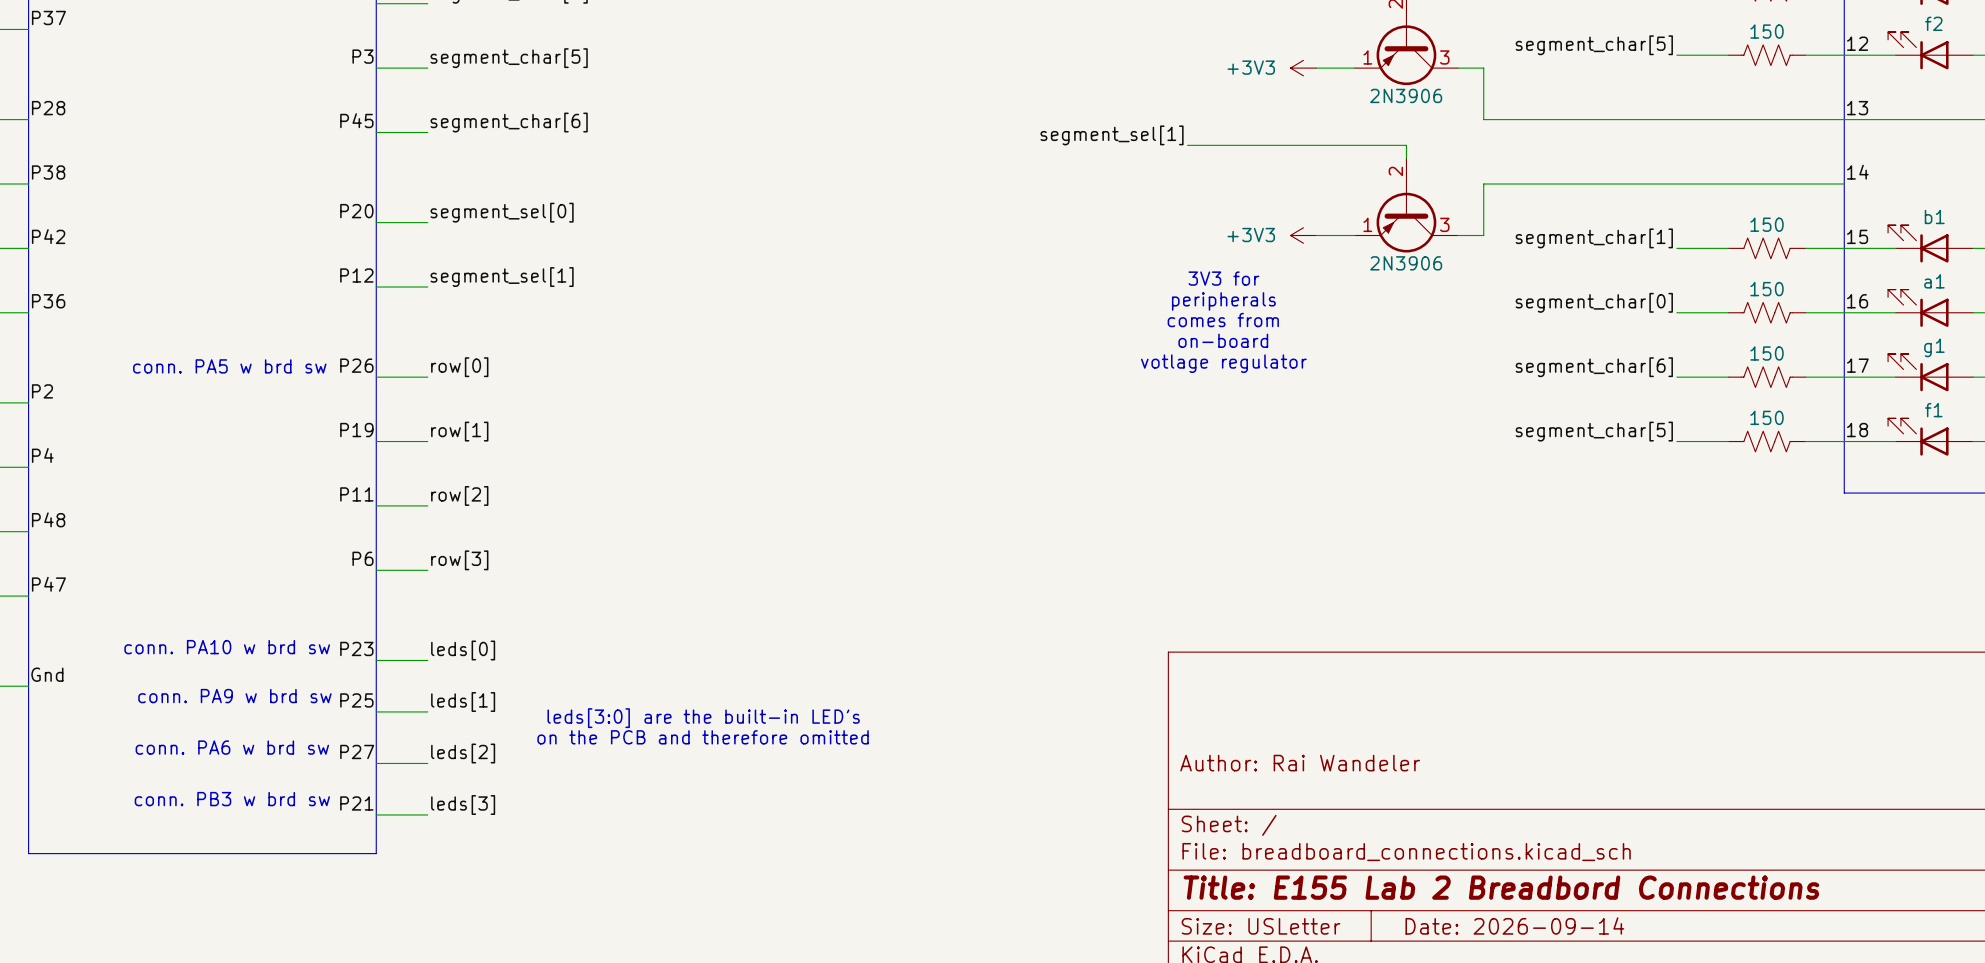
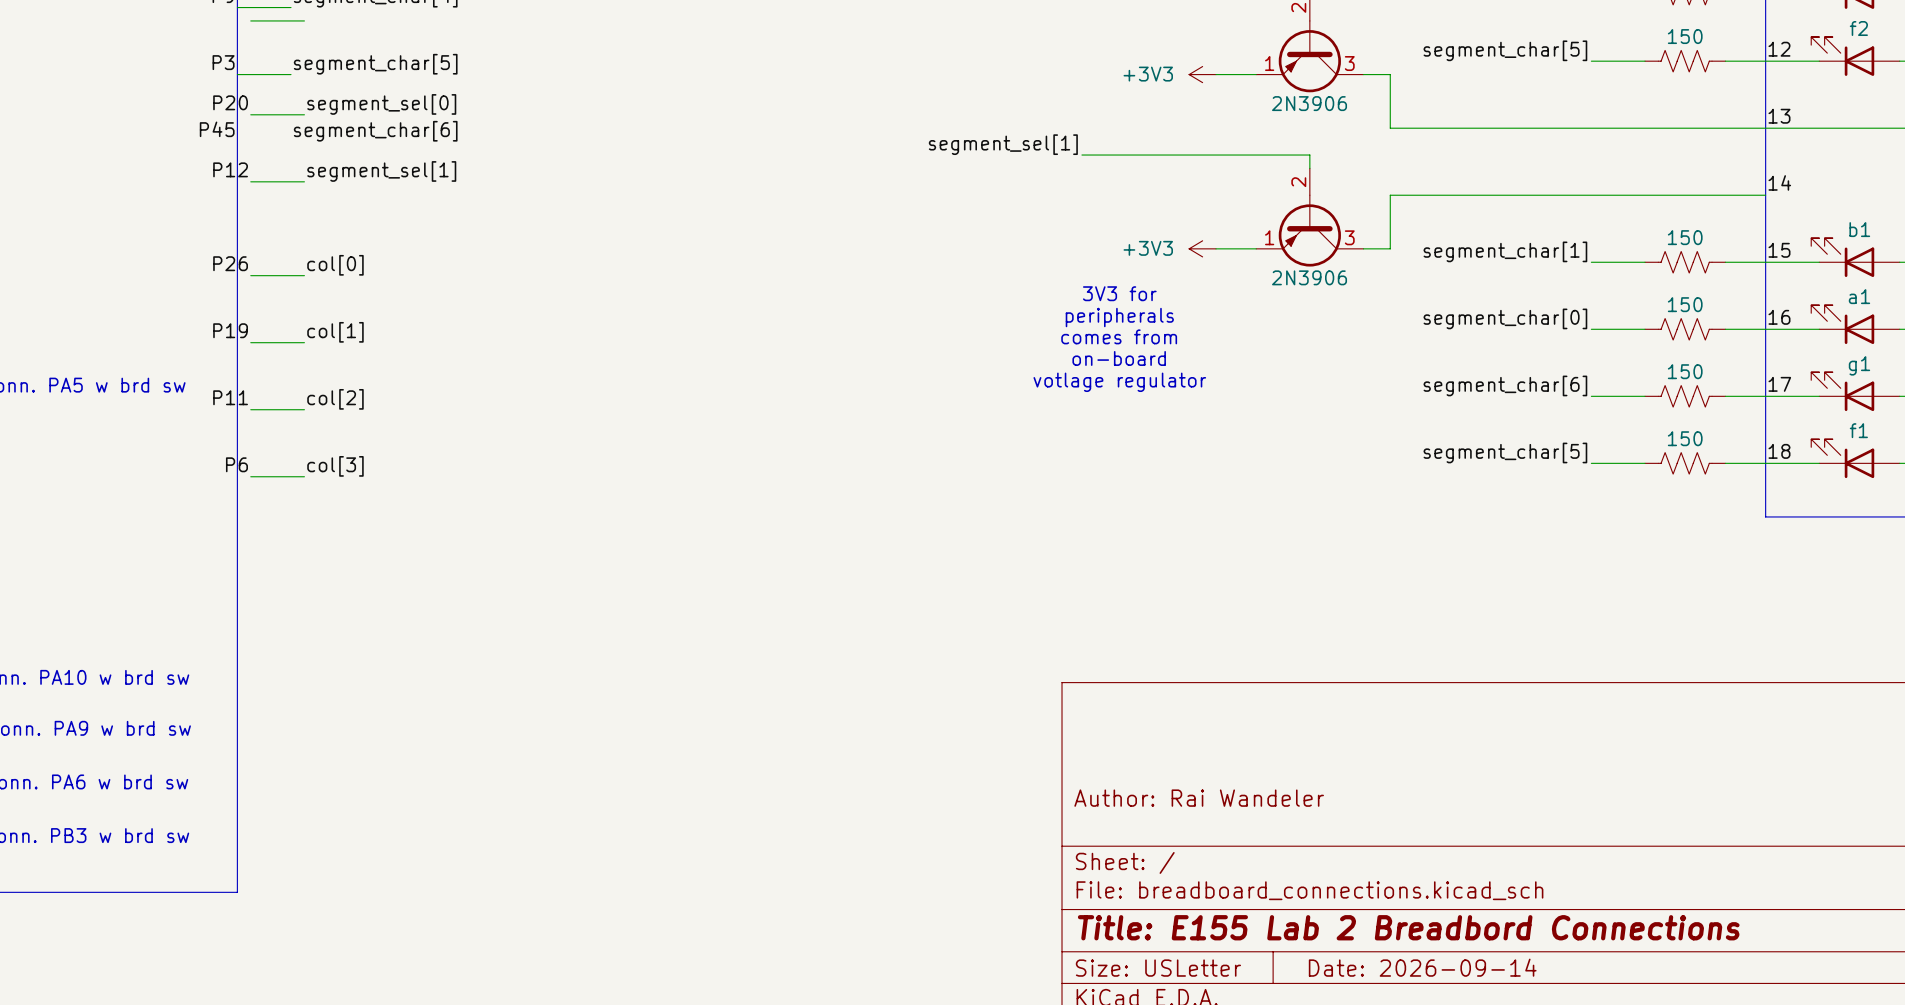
wire: (376, 132) (427, 132) -> (250, 20) (304, 20)
label position: P20 (356, 211) -> P20 (230, 102)
label position: segment_sel[0] (502, 212) -> segment_sel[0] (381, 104)
wire: (376, 222) (427, 222) -> (250, 114) (304, 114)
label: none -> col[0] (335, 265)
label position: P12 (356, 275) -> P12 (230, 169)
label position: segment_sel[1] (502, 277) -> segment_sel[1] (381, 171)
wire: (376, 287) (427, 287) -> (250, 181) (304, 181)
label: none -> col[1] (335, 332)
label position: P26 (356, 365) -> P26 (230, 263)
label: row[0] (459, 367) -> none
wire: (376, 377) (427, 377) -> (250, 275) (304, 275)
label: none -> col[2] (335, 399)
label position: P19 (356, 430) -> P19 (230, 330)
label: row[1] (459, 431) -> none
wire: (376, 441) (427, 441) -> (250, 342) (304, 342)
label: none -> col[3] (335, 466)
label position: P11 (356, 494) -> P11 (230, 397)
label: row[2] (459, 495) -> none
wire: (376, 505) (427, 505) -> (250, 409) (304, 409)
label position: P6 (362, 558) -> P6 (236, 464)
label: row[3] (459, 560) -> none
wire: (376, 570) (427, 570) -> (250, 476) (304, 476)
label: P23 (356, 648) -> none
label: leds[0] (463, 650) -> none
wire: (376, 660) (427, 660) -> none
label: P25 (356, 700) -> none
label: leds[1] (463, 702) -> none
wire: (376, 711) (427, 711) -> none
text: leds[3:0] are the built-in LED's (703, 718) -> none
text: on the PCB and therefore omitted (703, 737) -> none
label: P27 (357, 751) -> none
label: leds[2] (463, 753) -> none
wire: (376, 763) (427, 763) -> none
label: P21 (356, 803) -> none
label: leds[3] (463, 805) -> none
wire: (376, 814) (427, 814) -> none

